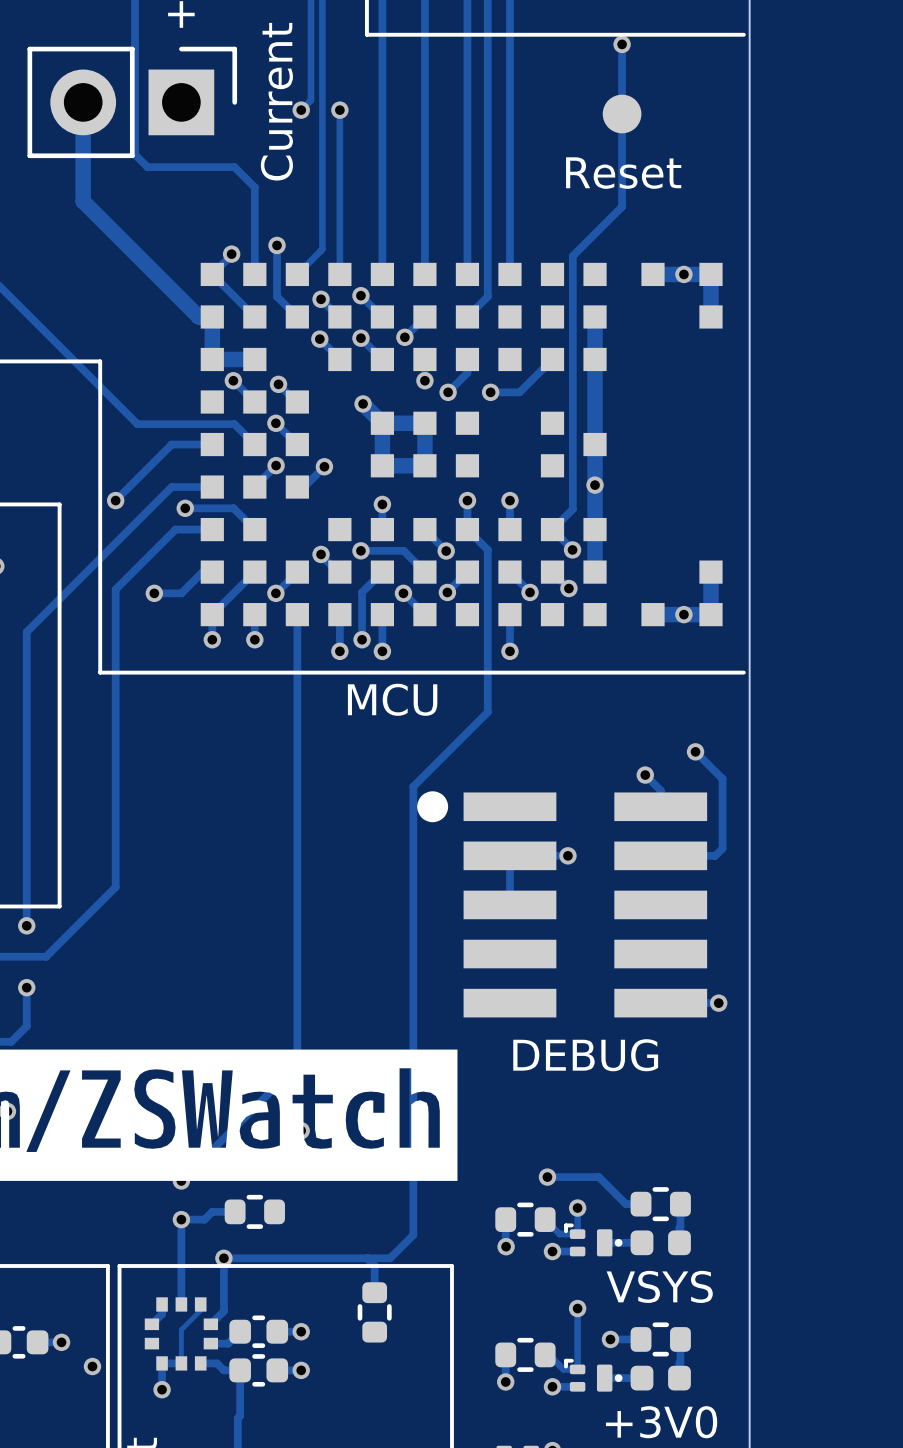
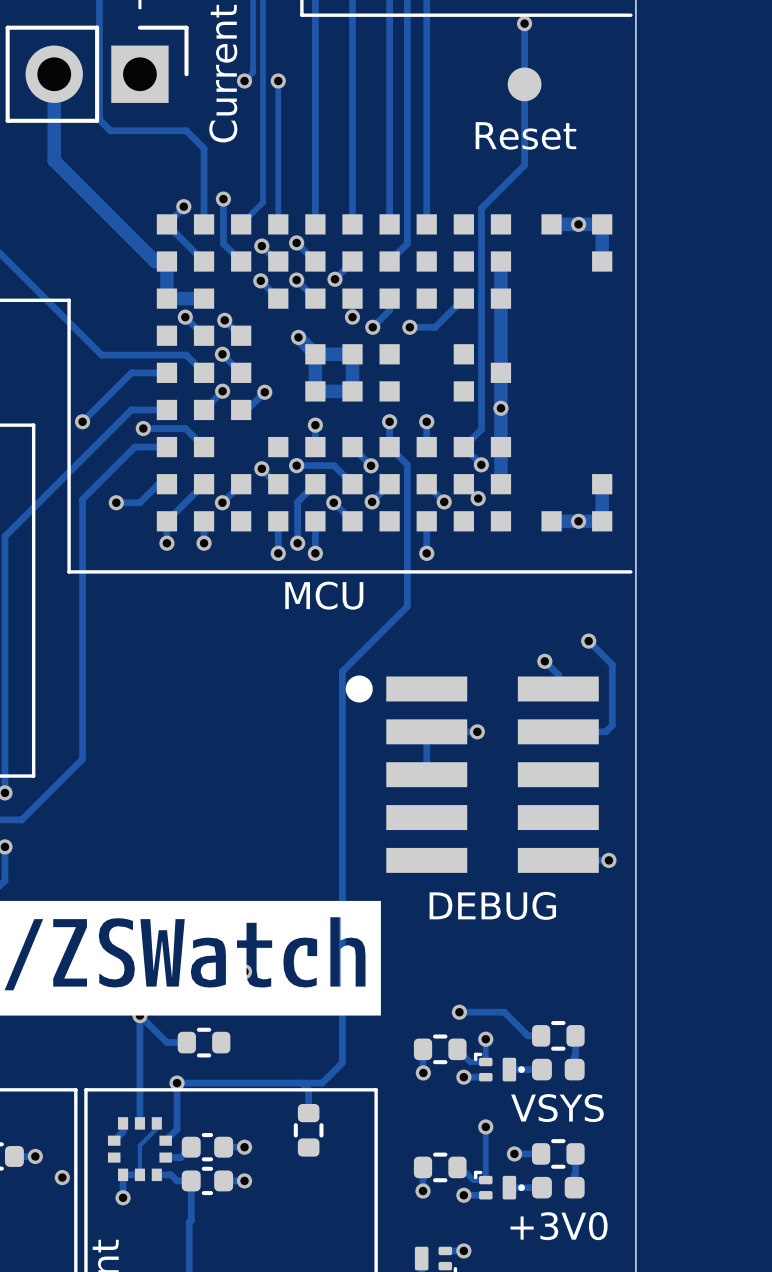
track: (297, 614) (297, 1064) (181, 1180) -> none
track: (212, 1211) (204, 1219) (181, 1219) -> (166, 1042) (139, 1015) (139, 1049)
via: (181, 1219) -> none

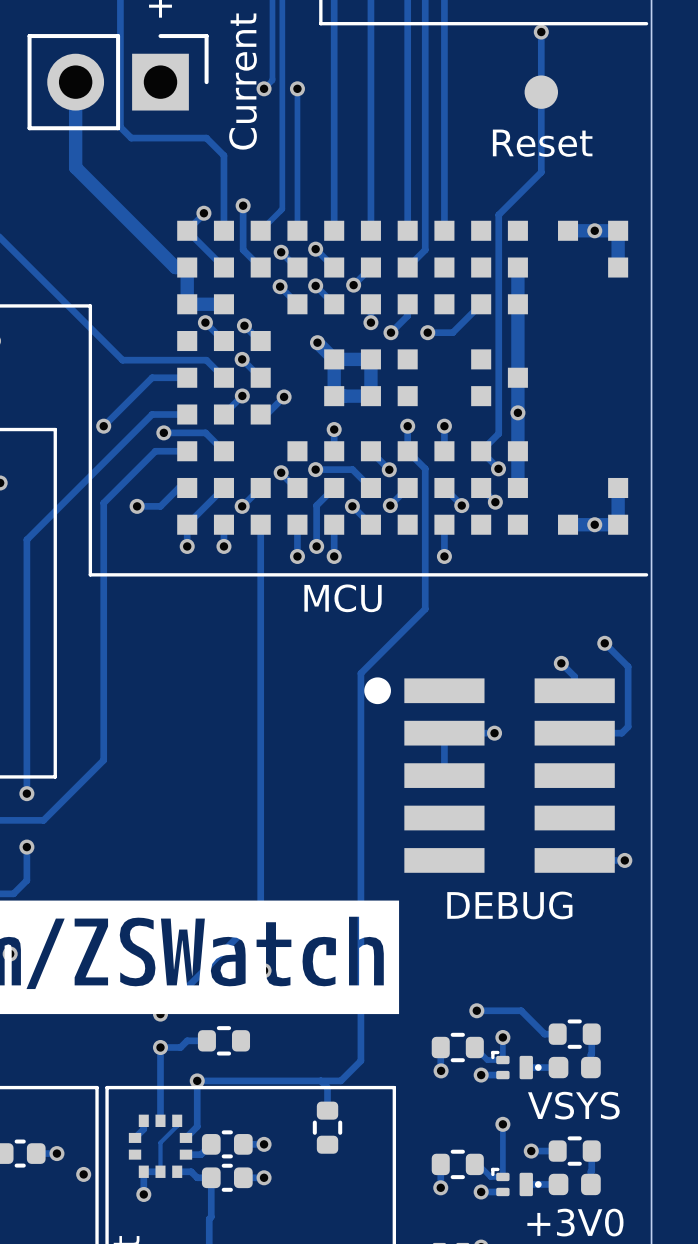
track: none -> (260, 524) (260, 913) (160, 1014)
track: (166, 1042) (139, 1015) (139, 1049) -> (187, 1040) (180, 1047) (160, 1047)
via: none -> (160, 1047)

